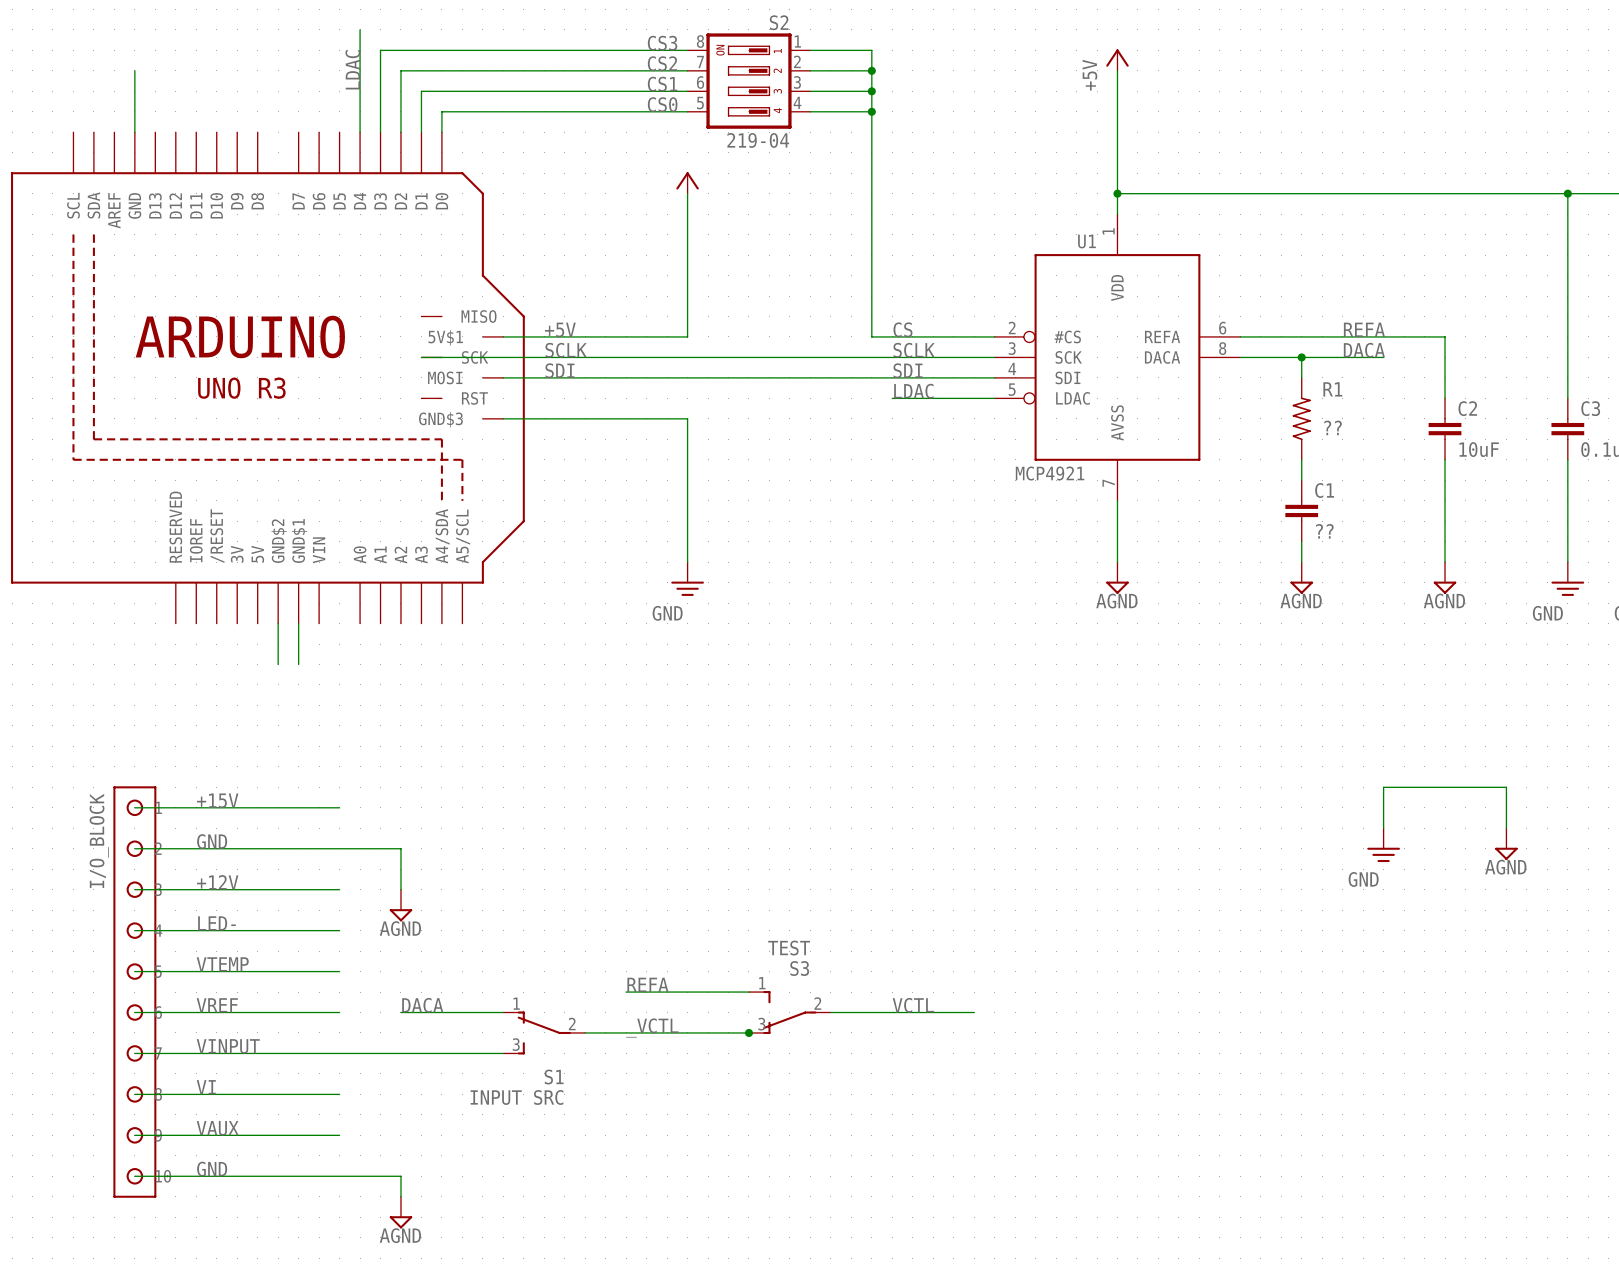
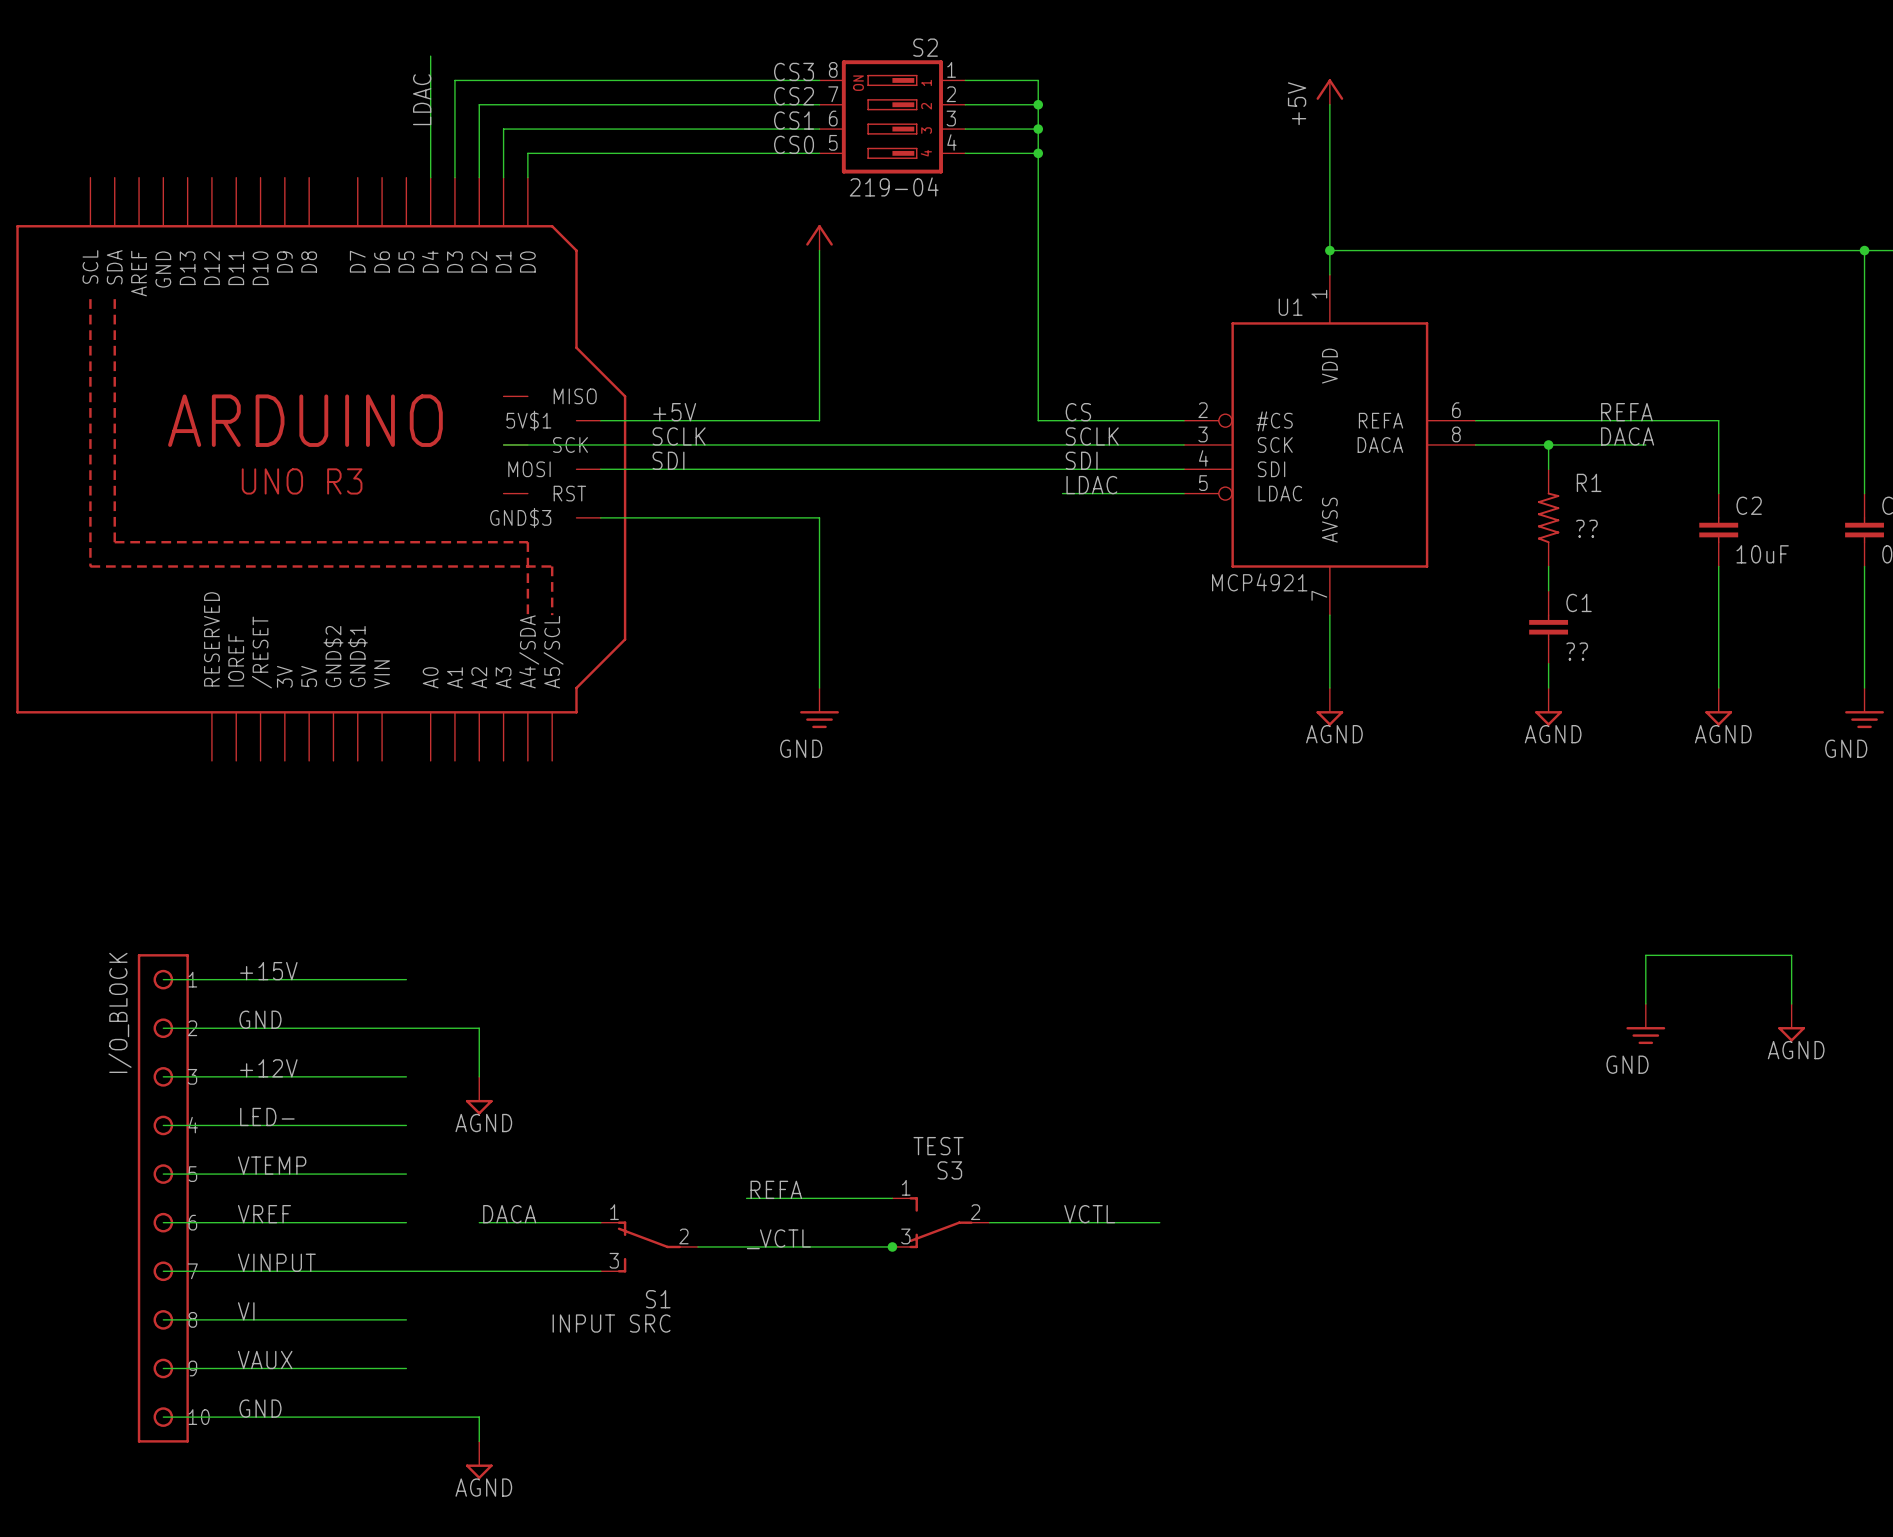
wire: (134, 70) (134, 132) -> none
wire: (278, 623) (278, 664) -> none
wire: (298, 623) (298, 664) -> none

